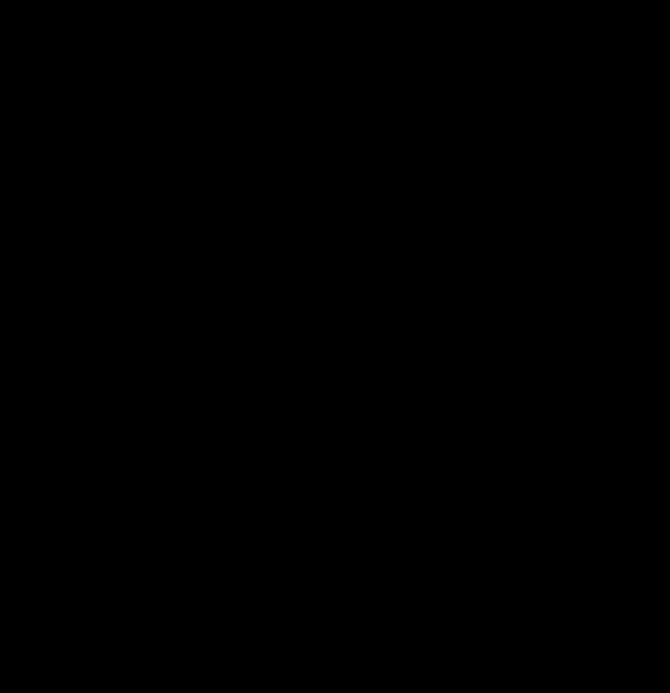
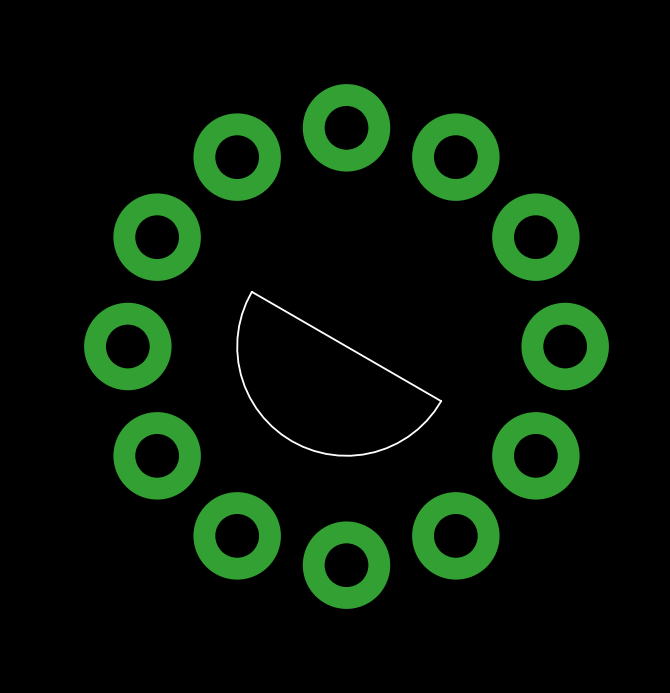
part: none -> (346, 346)

